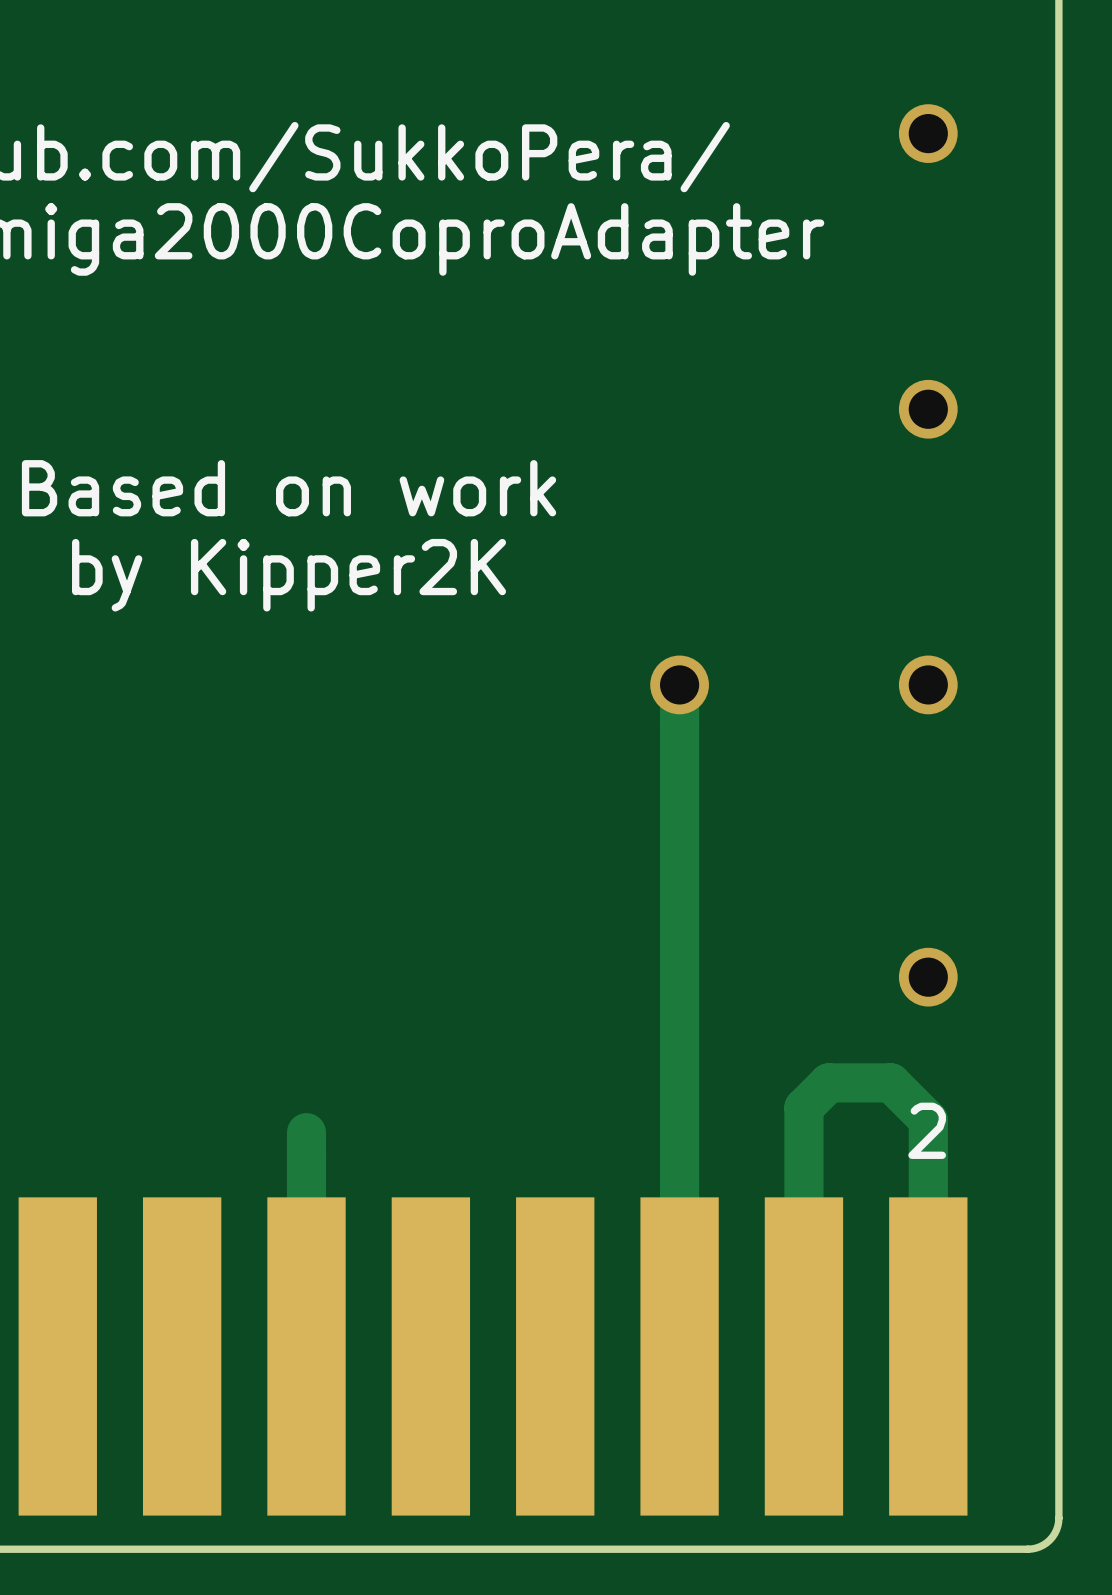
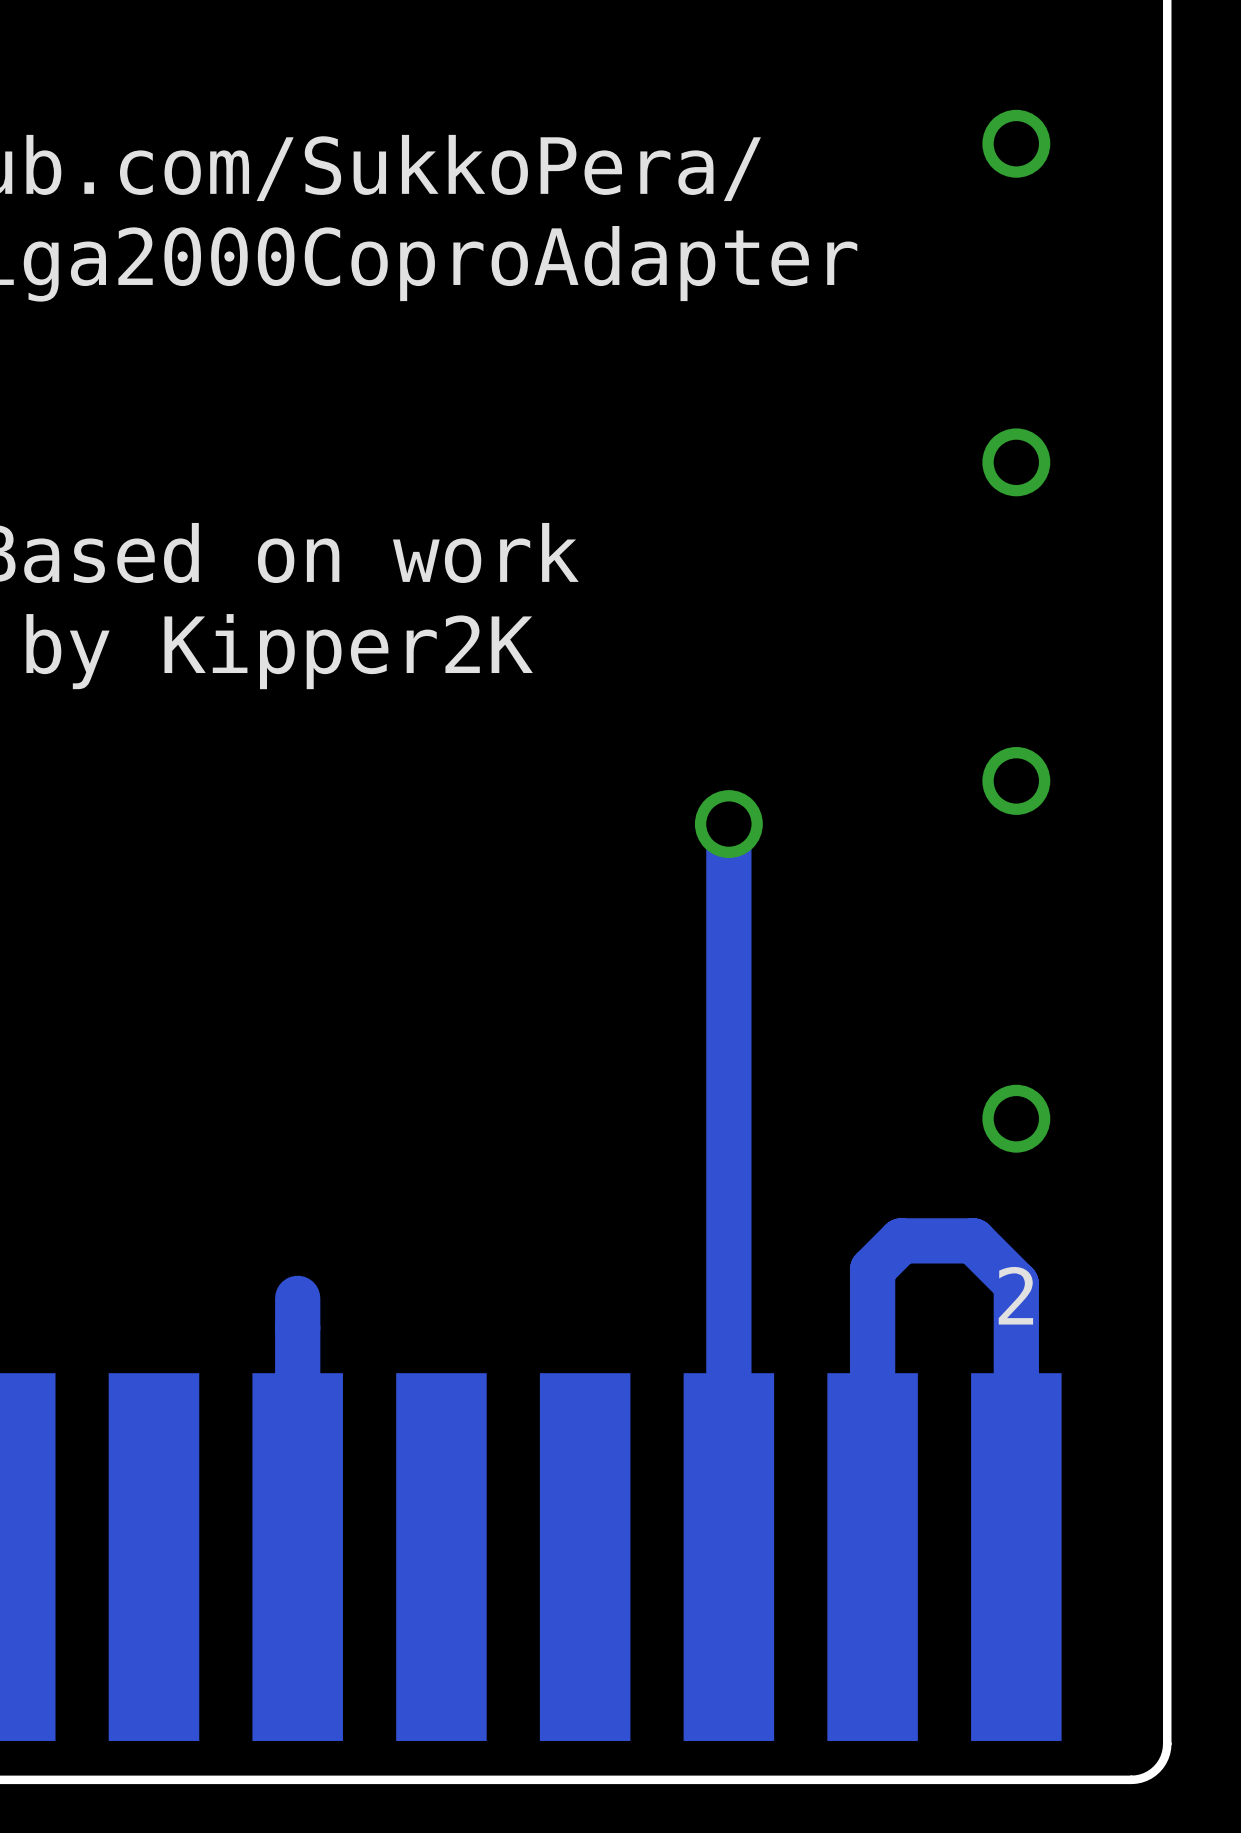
via position: (679, 684) -> (728, 824)

